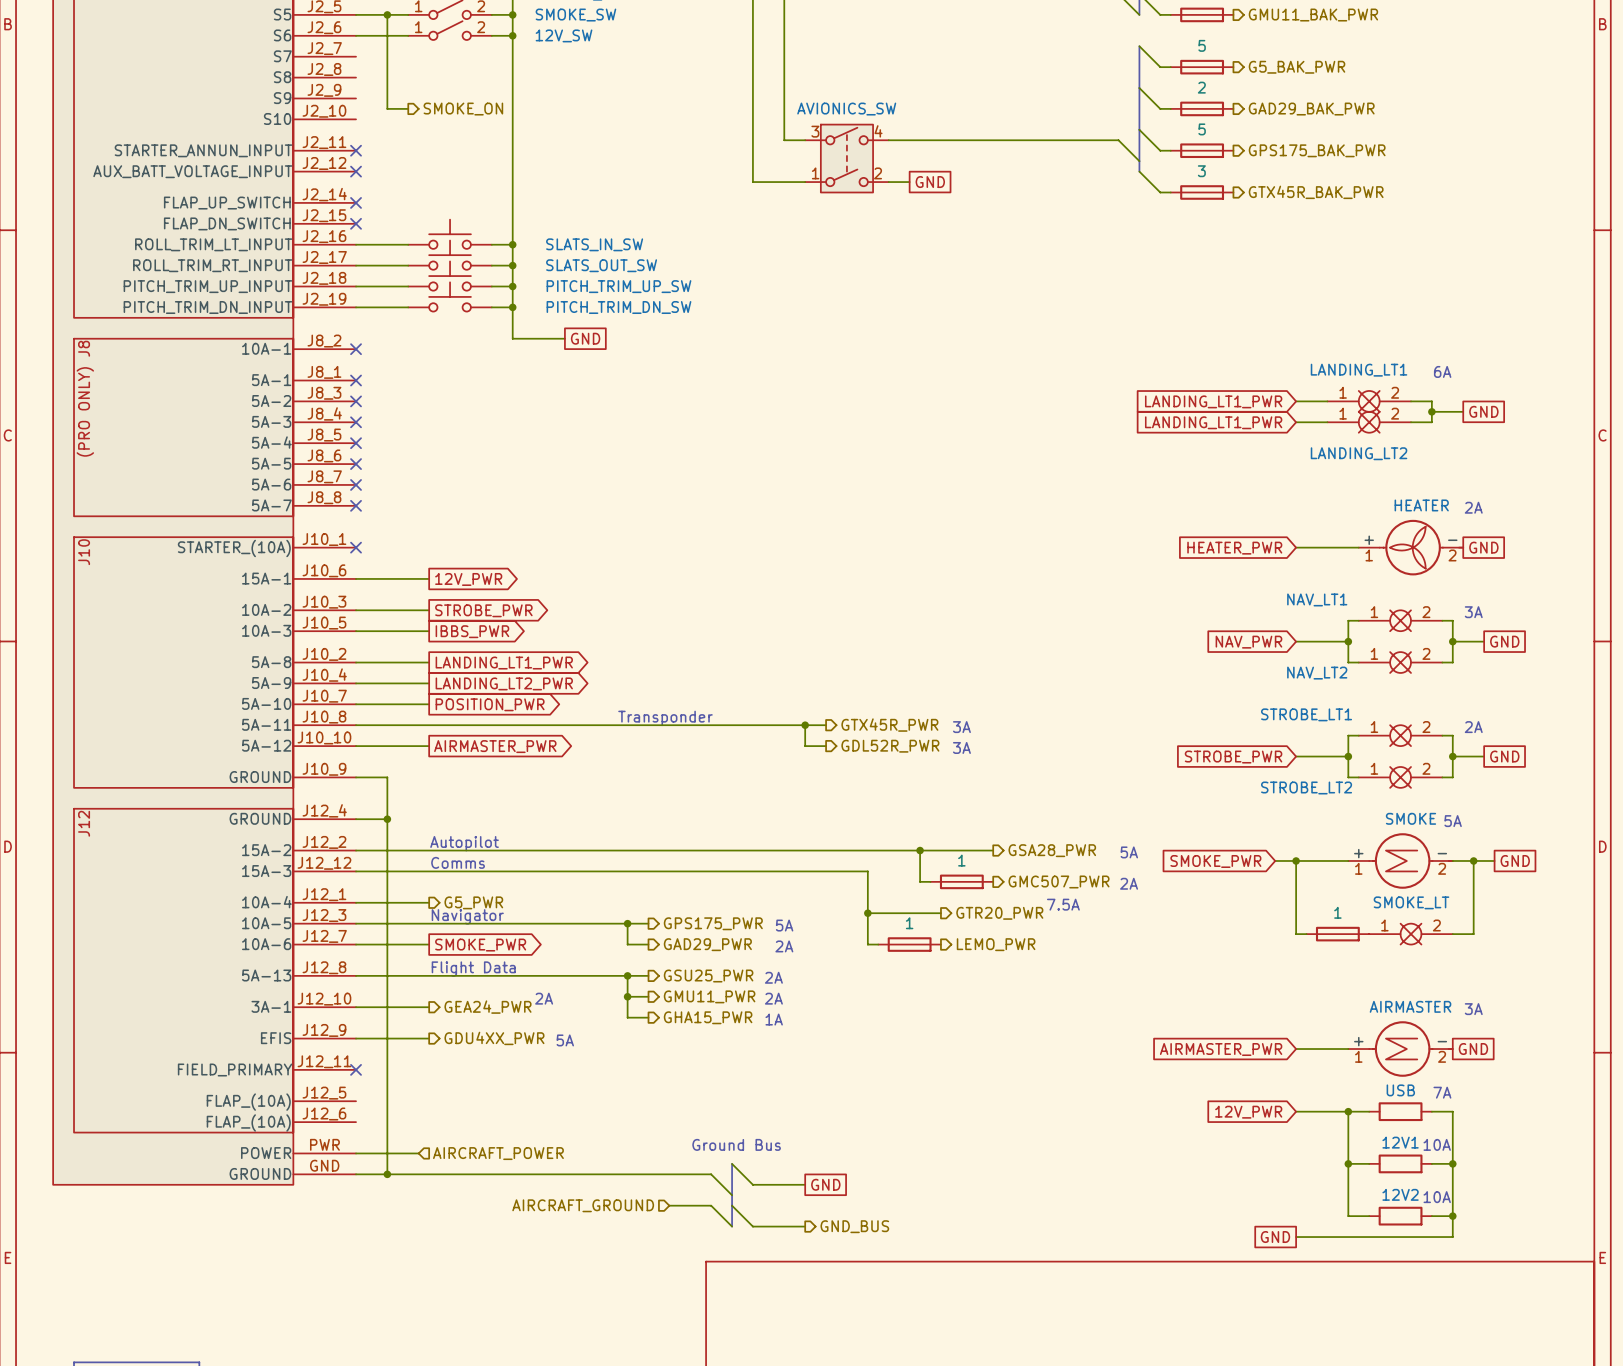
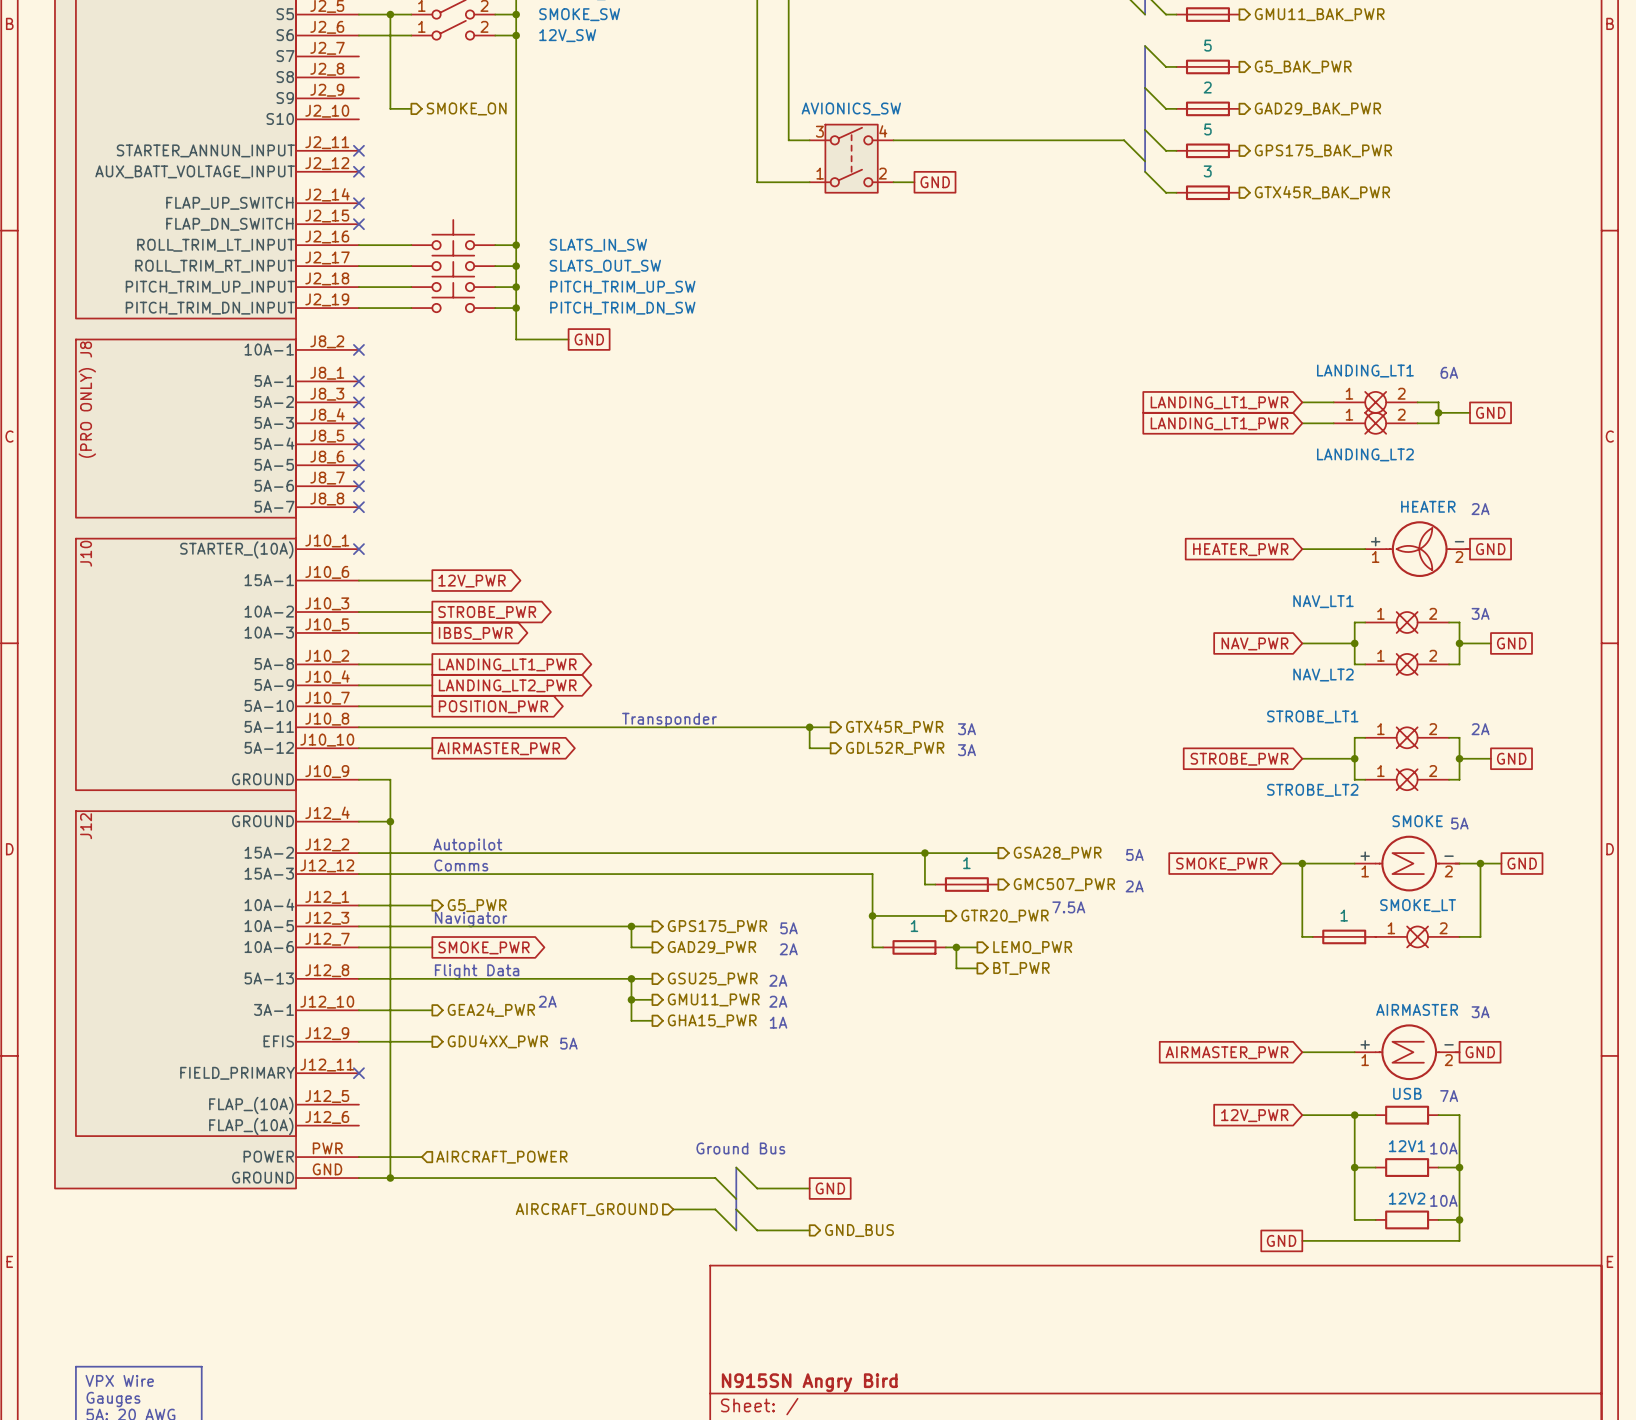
wire: none -> (945, 947) (977, 947)
wire: none -> (956, 947) (956, 968) (977, 968)
junction: none -> (956, 947)
hierarchical label position: LEMO_PWR (996, 944) -> LEMO_PWR (1032, 947)
hierarchical label: none -> BT_PWR (1021, 968)

